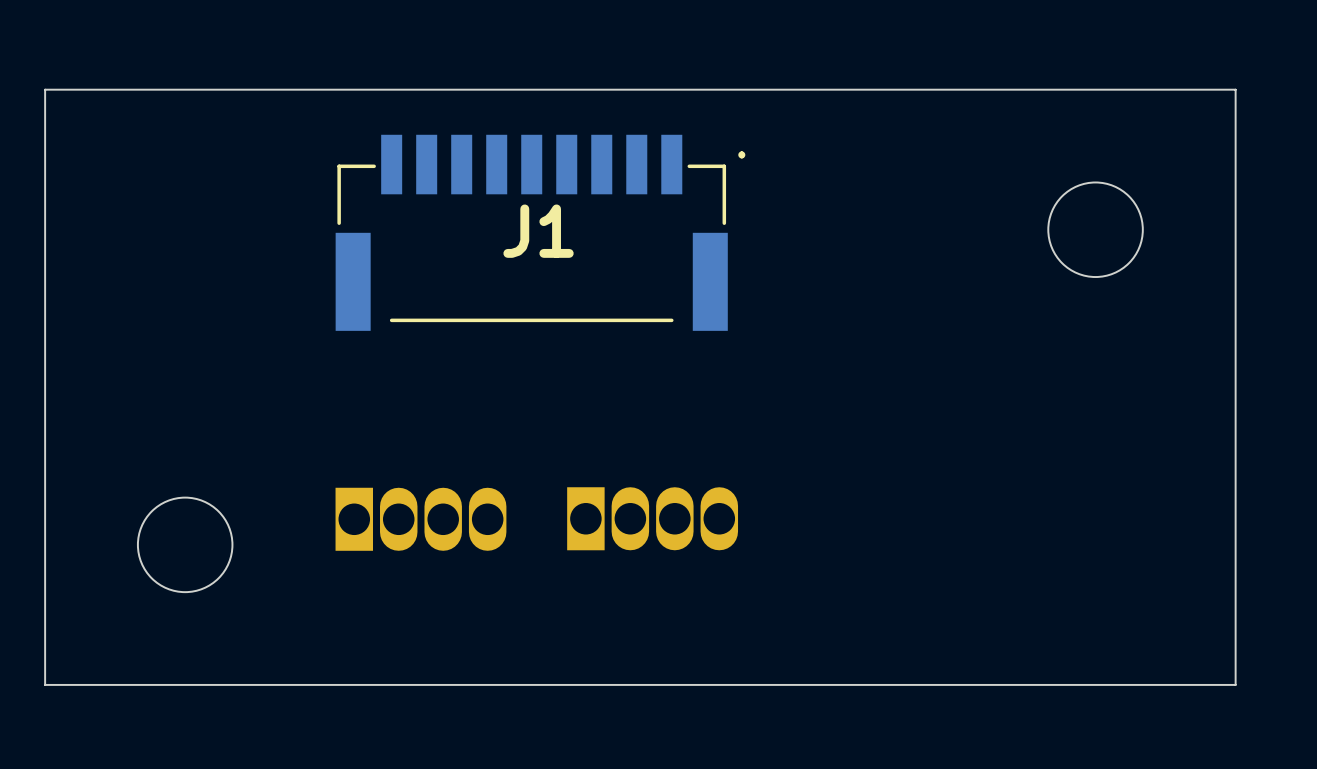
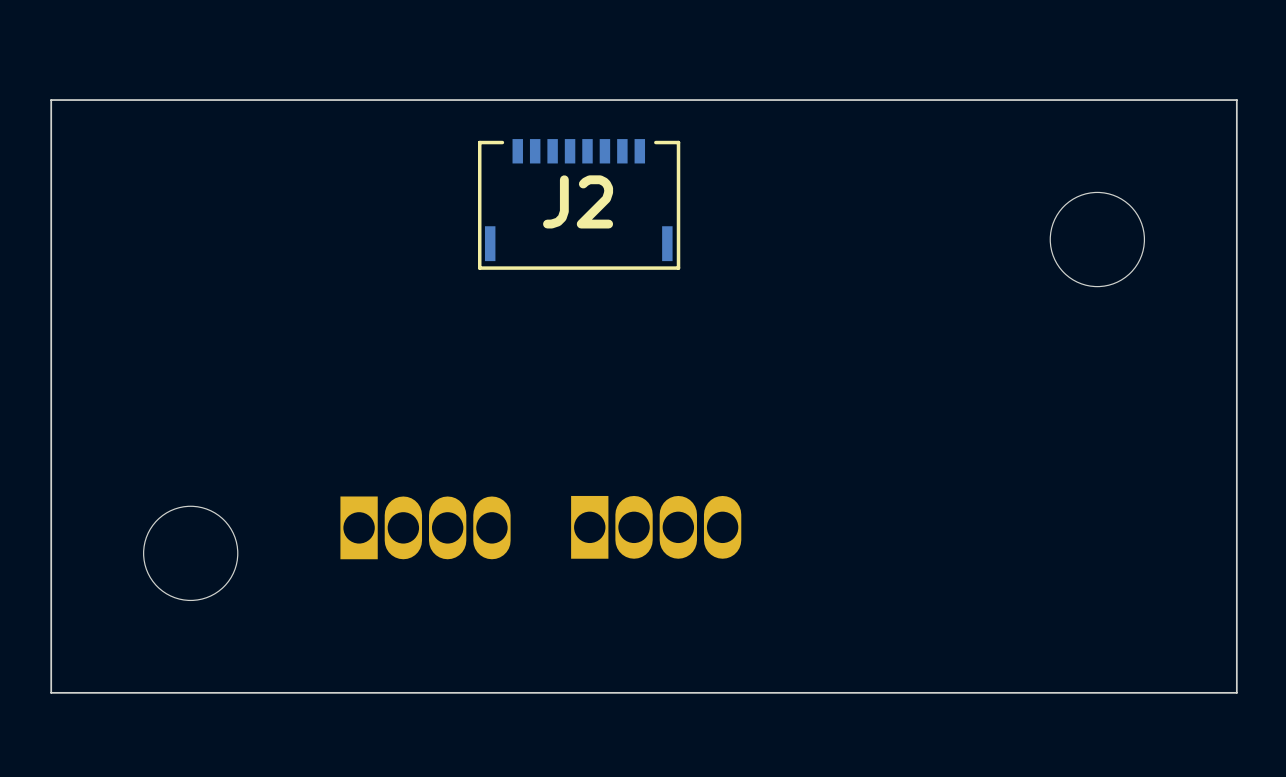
J2: none -> (579, 204)
J1: (540, 232) -> none

